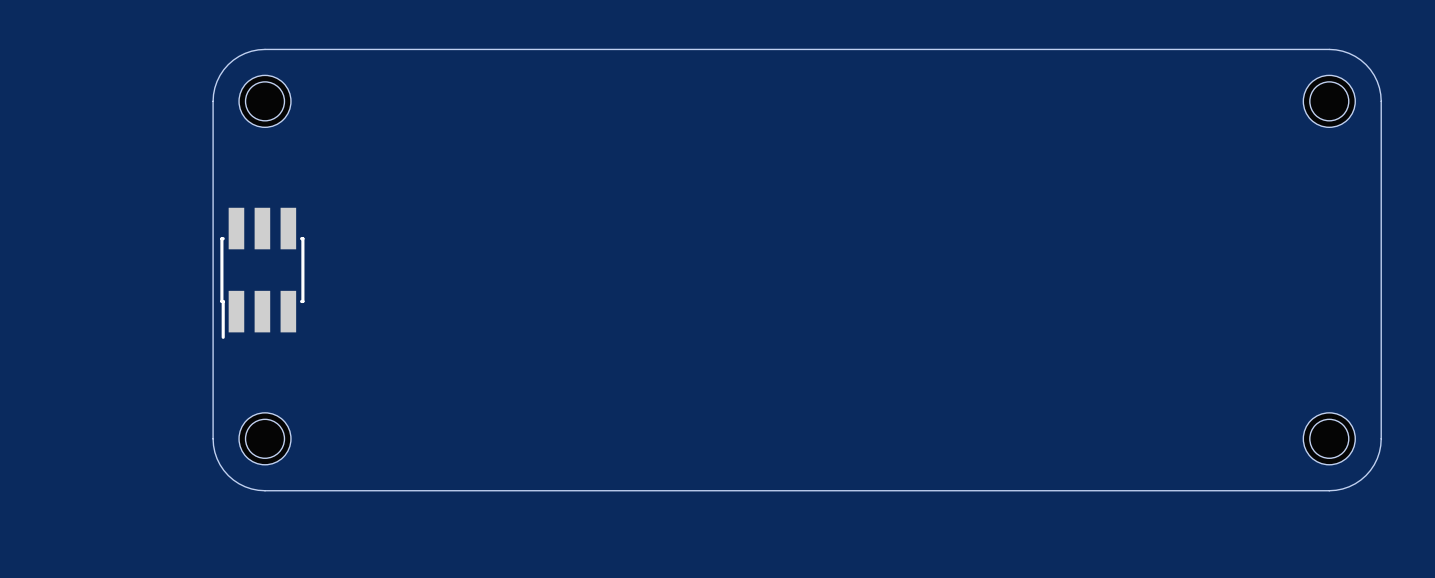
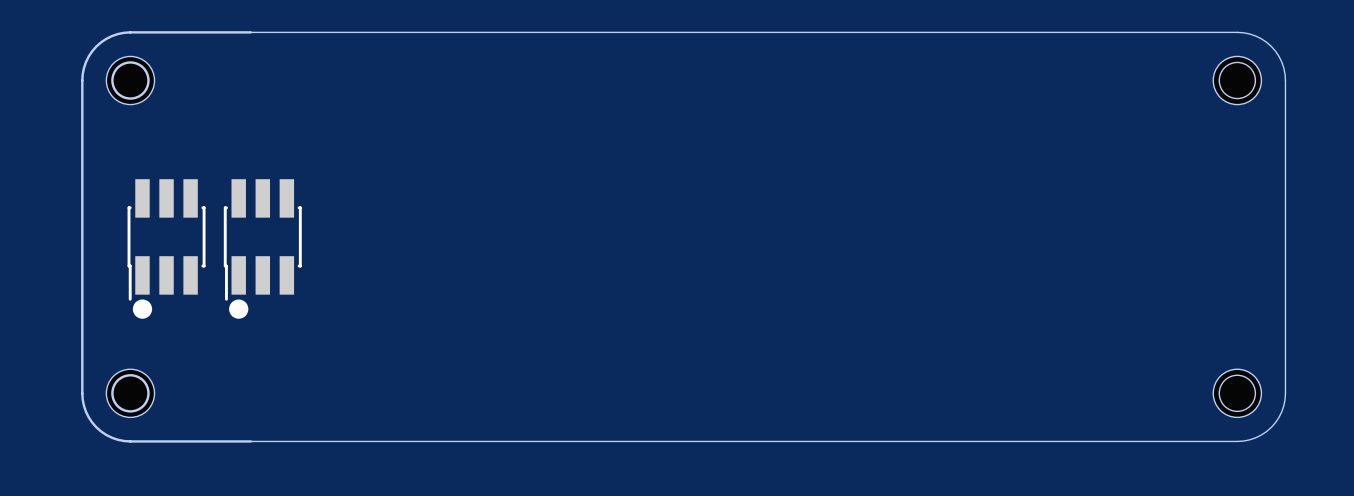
board edge: (265, 49) (245, 53) (228, 64) (217, 81) (213, 101) (213, 445) (217, 458) (228, 475) (245, 486) (265, 490) -> (250, 32) (117, 34) (106, 38) (92, 51) (85, 62) (82, 80) (82, 393) (85, 411) (92, 422) (101, 431) (112, 437) (124, 441) (250, 441)
round board edge: none -> [111, 61, 150, 100]
round board edge: [245, 81, 285, 121] -> none
part position: (265, 101) -> (130, 80)
part footprint: [220, 207, 305, 339] -> [223, 179, 302, 319]
part: none -> (166, 248)
round board edge: none -> [111, 374, 150, 413]
round board edge: [245, 419, 285, 459] -> none
part position: (265, 438) -> (130, 393)

